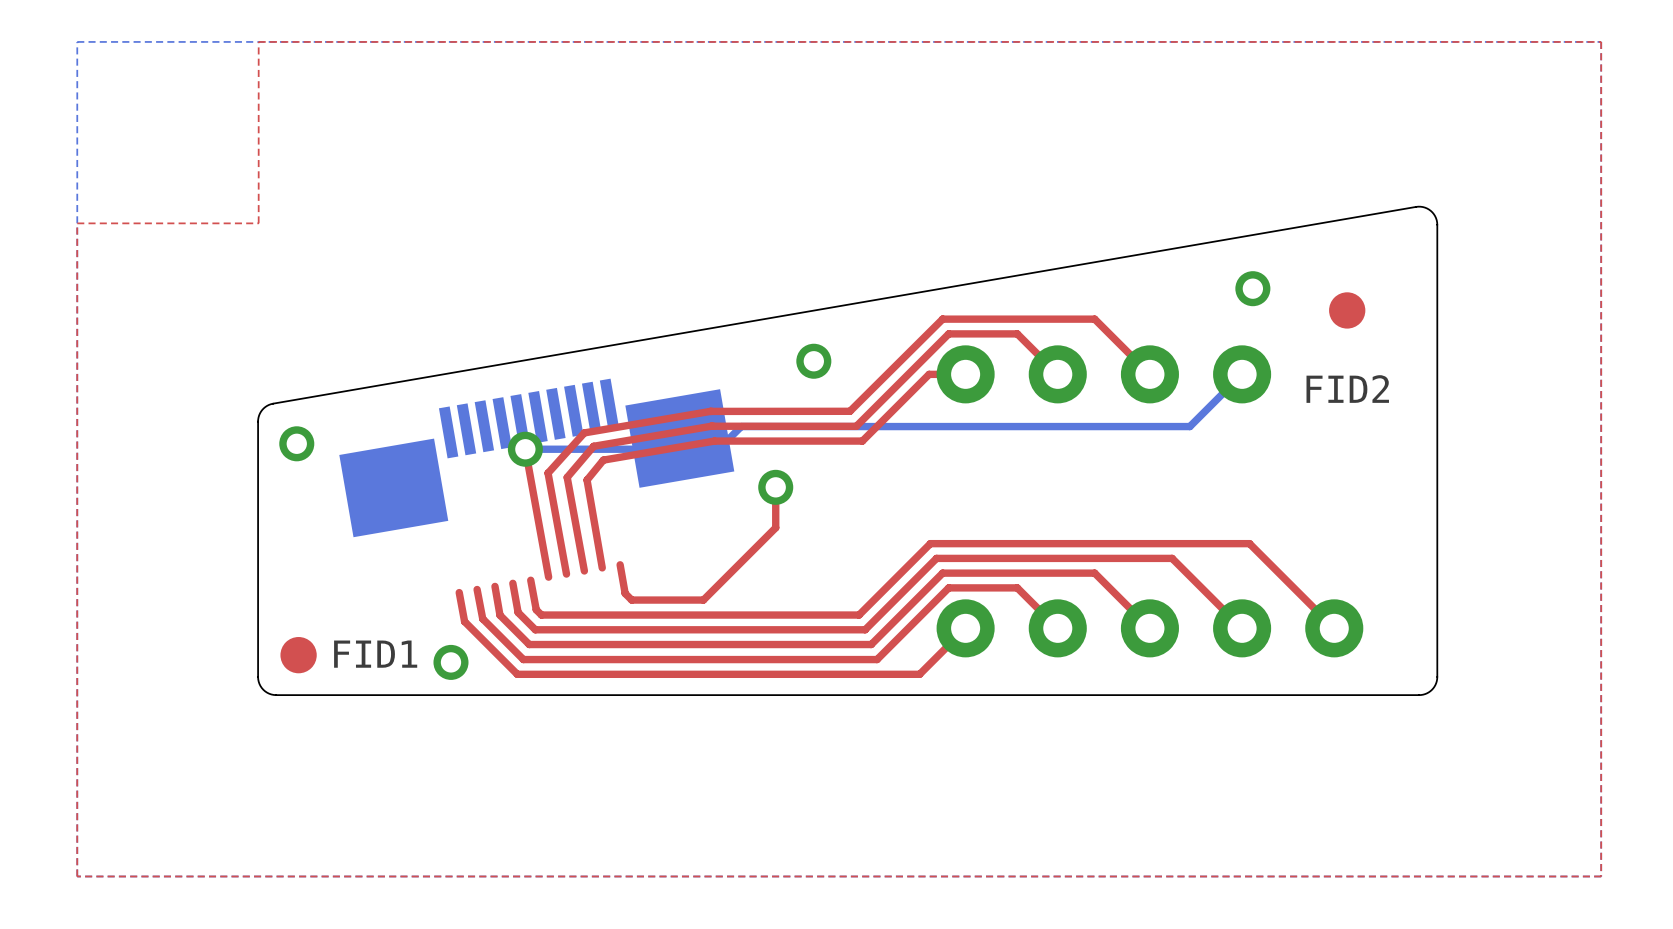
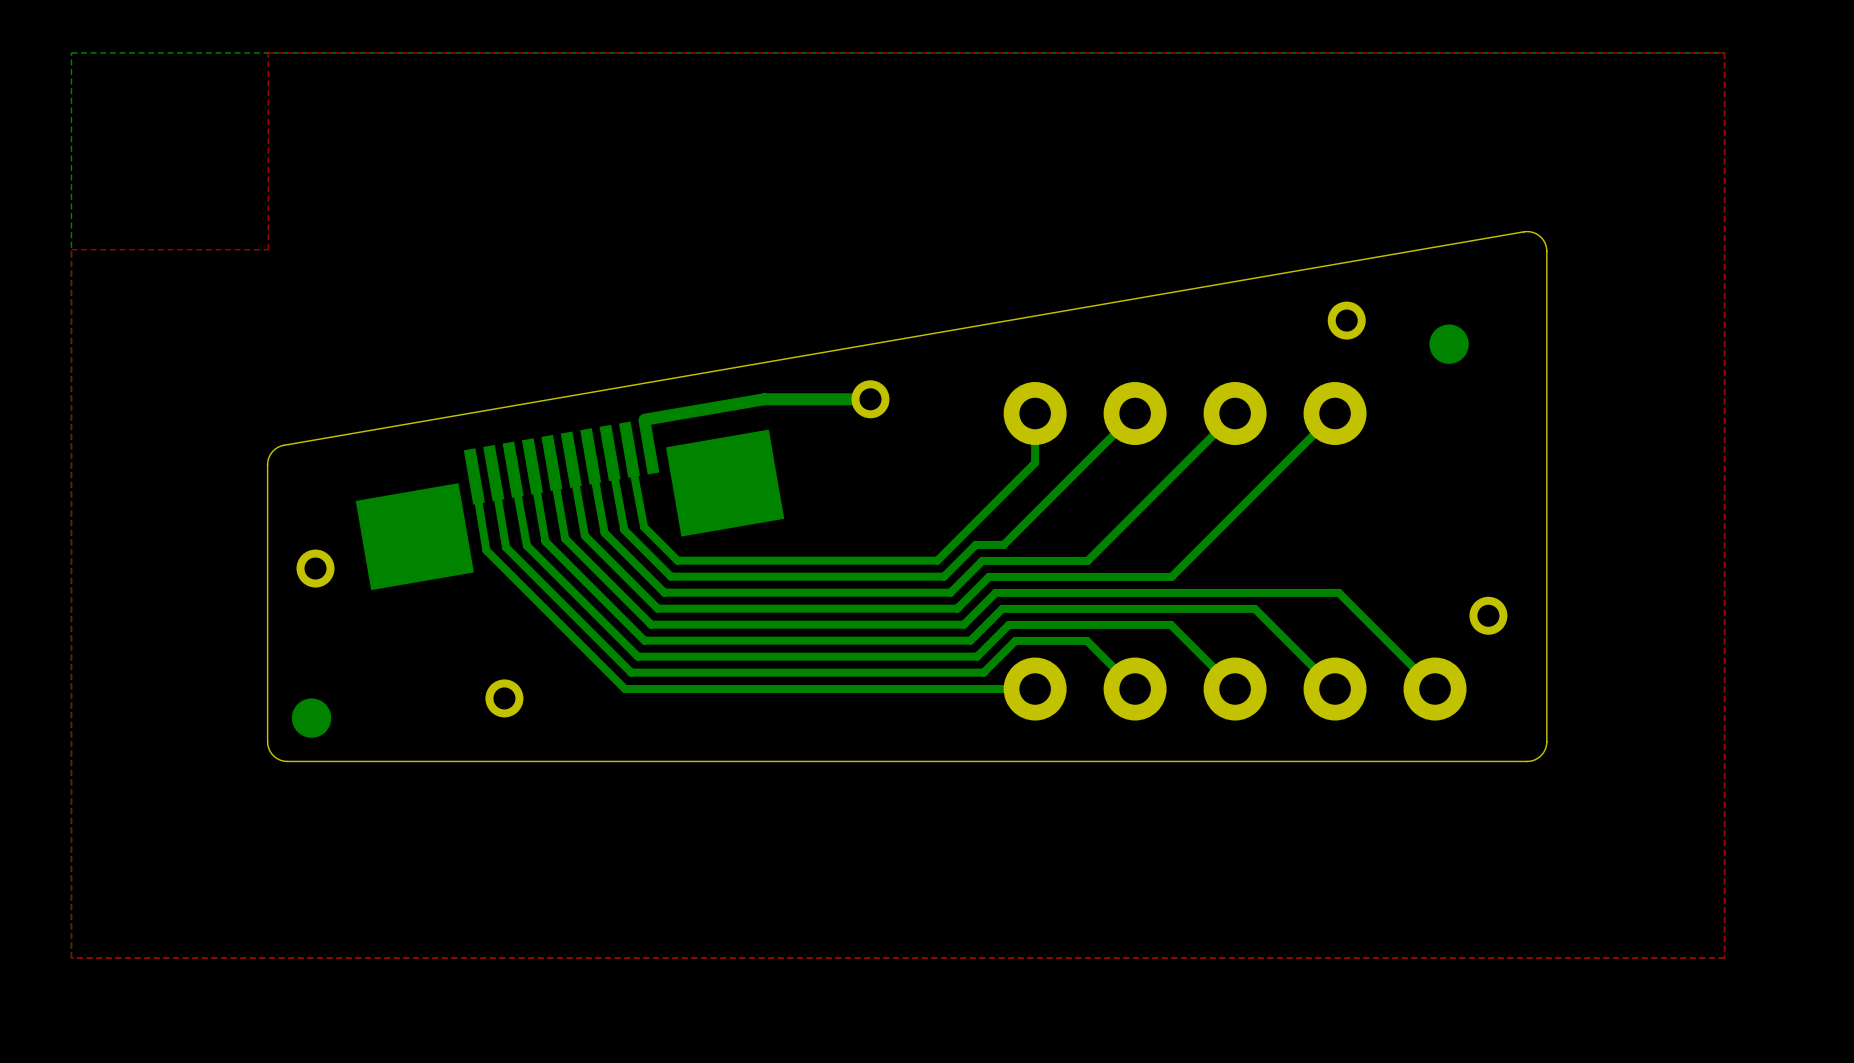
FID2 side: top (1347, 310) -> bottom (1449, 344)
bottom track: none -> (870, 399) (764, 399) (644, 419)
top track: (965, 374) (929, 374) (862, 441) (714, 441) (603, 460) (587, 480) (602, 567) -> none
bottom track: none -> (1035, 413) (1035, 462) (937, 560) (677, 560) (644, 527) (629, 449)
top track: (1057, 374) (1017, 333) (948, 333) (856, 426) (711, 426) (593, 446) (567, 477) (584, 570) -> none
bottom track: none -> (1135, 413) (1003, 544) (975, 544) (944, 576) (670, 576) (624, 529) (610, 453)
top track: (1149, 374) (1094, 319) (942, 319) (849, 411) (710, 411) (584, 432) (548, 473) (566, 574) -> none
bottom track: none -> (1235, 413) (1087, 560) (982, 560) (950, 592) (664, 592) (604, 532) (590, 456)
bottom track: none -> (551, 463) (565, 538) (651, 624) (963, 624) (995, 592) (1338, 592) (1435, 689)
bottom track: none -> (532, 466) (545, 541) (644, 640) (970, 640) (1002, 608) (1254, 608) (1335, 689)
bottom track: none -> (513, 469) (526, 545) (637, 656) (977, 656) (1008, 624) (1170, 624) (1235, 689)
bottom track: (1189, 426) (741, 426) (718, 449) (525, 449) -> (1278, 470) (1171, 576) (989, 576) (957, 608) (657, 608) (584, 535) (571, 459)
bottom track: none -> (493, 473) (505, 547) (631, 672) (983, 672) (1015, 640) (1086, 640) (1135, 689)
bottom track: none -> (474, 476) (486, 550) (625, 689) (1035, 689)
part position: (296, 443) -> (315, 568)
top track: (525, 449) (548, 577) -> none
via: (525, 449) -> none
top track: (775, 487) (775, 527) (703, 600) (631, 600) (625, 593) (620, 564) -> none
part: (775, 487) -> none
part: none -> (1488, 615)
top track: (530, 580) (536, 609) (541, 615) (859, 615) (930, 543) (1249, 543) (1334, 628) -> none
top track: (512, 583) (518, 612) (535, 629) (865, 629) (936, 558) (1172, 558) (1242, 628) -> none
top track: (494, 586) (499, 615) (529, 644) (871, 644) (942, 573) (1094, 573) (1149, 628) -> none
top track: (477, 589) (482, 618) (523, 659) (877, 659) (948, 587) (1017, 587) (1057, 628) -> none
top track: (459, 592) (464, 621) (517, 674) (919, 674) (965, 628) -> none
FID1 side: top (298, 655) -> bottom (311, 718)
part position: (450, 662) -> (504, 698)

